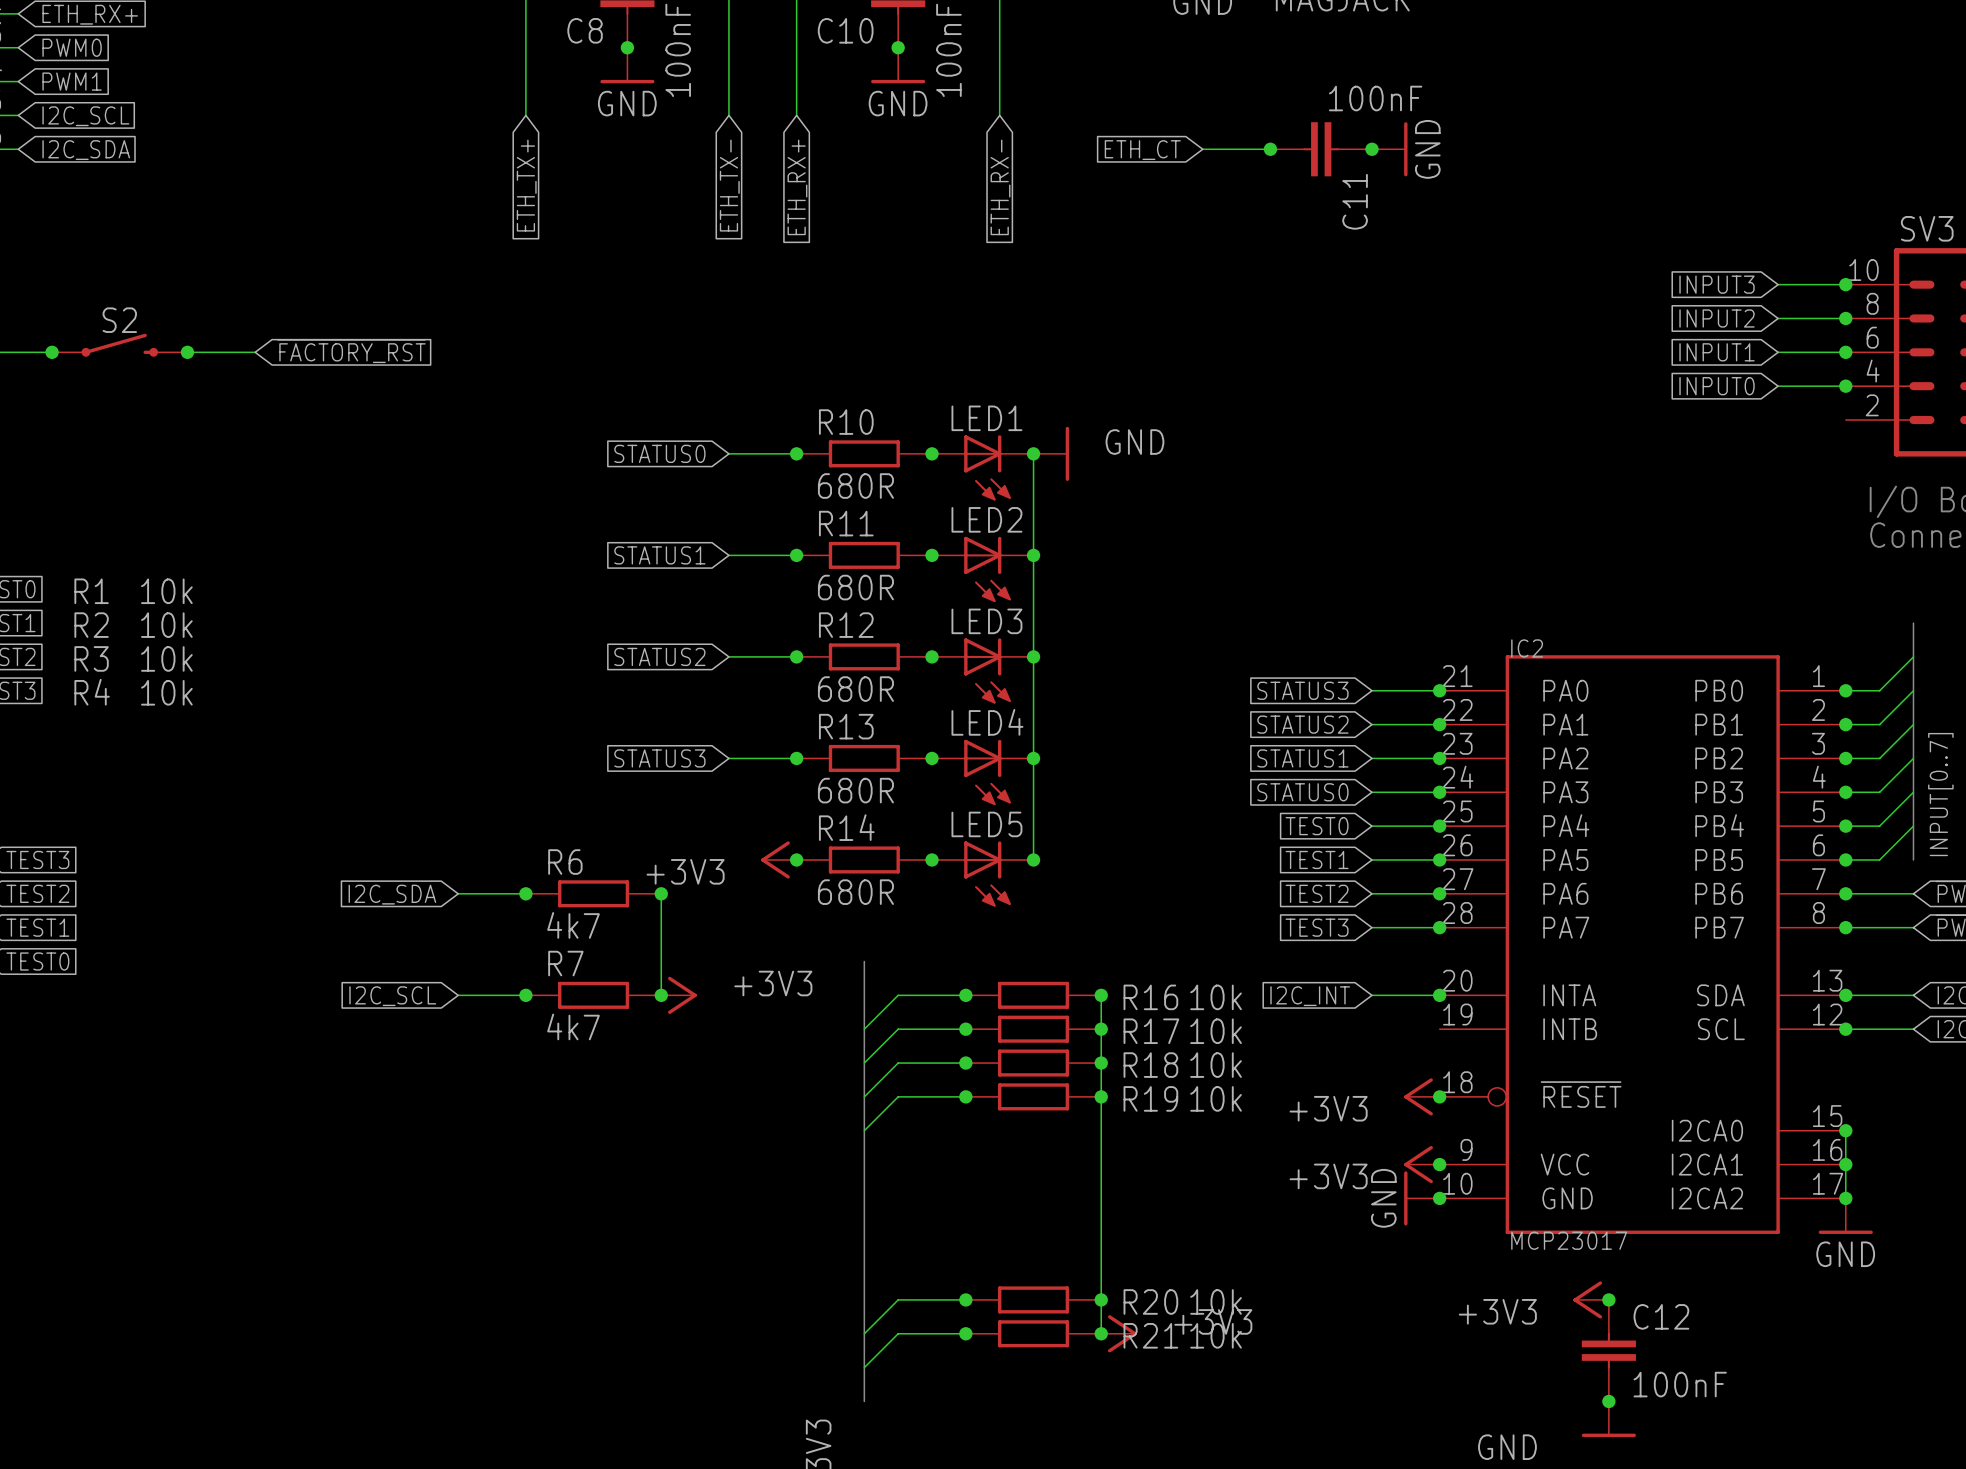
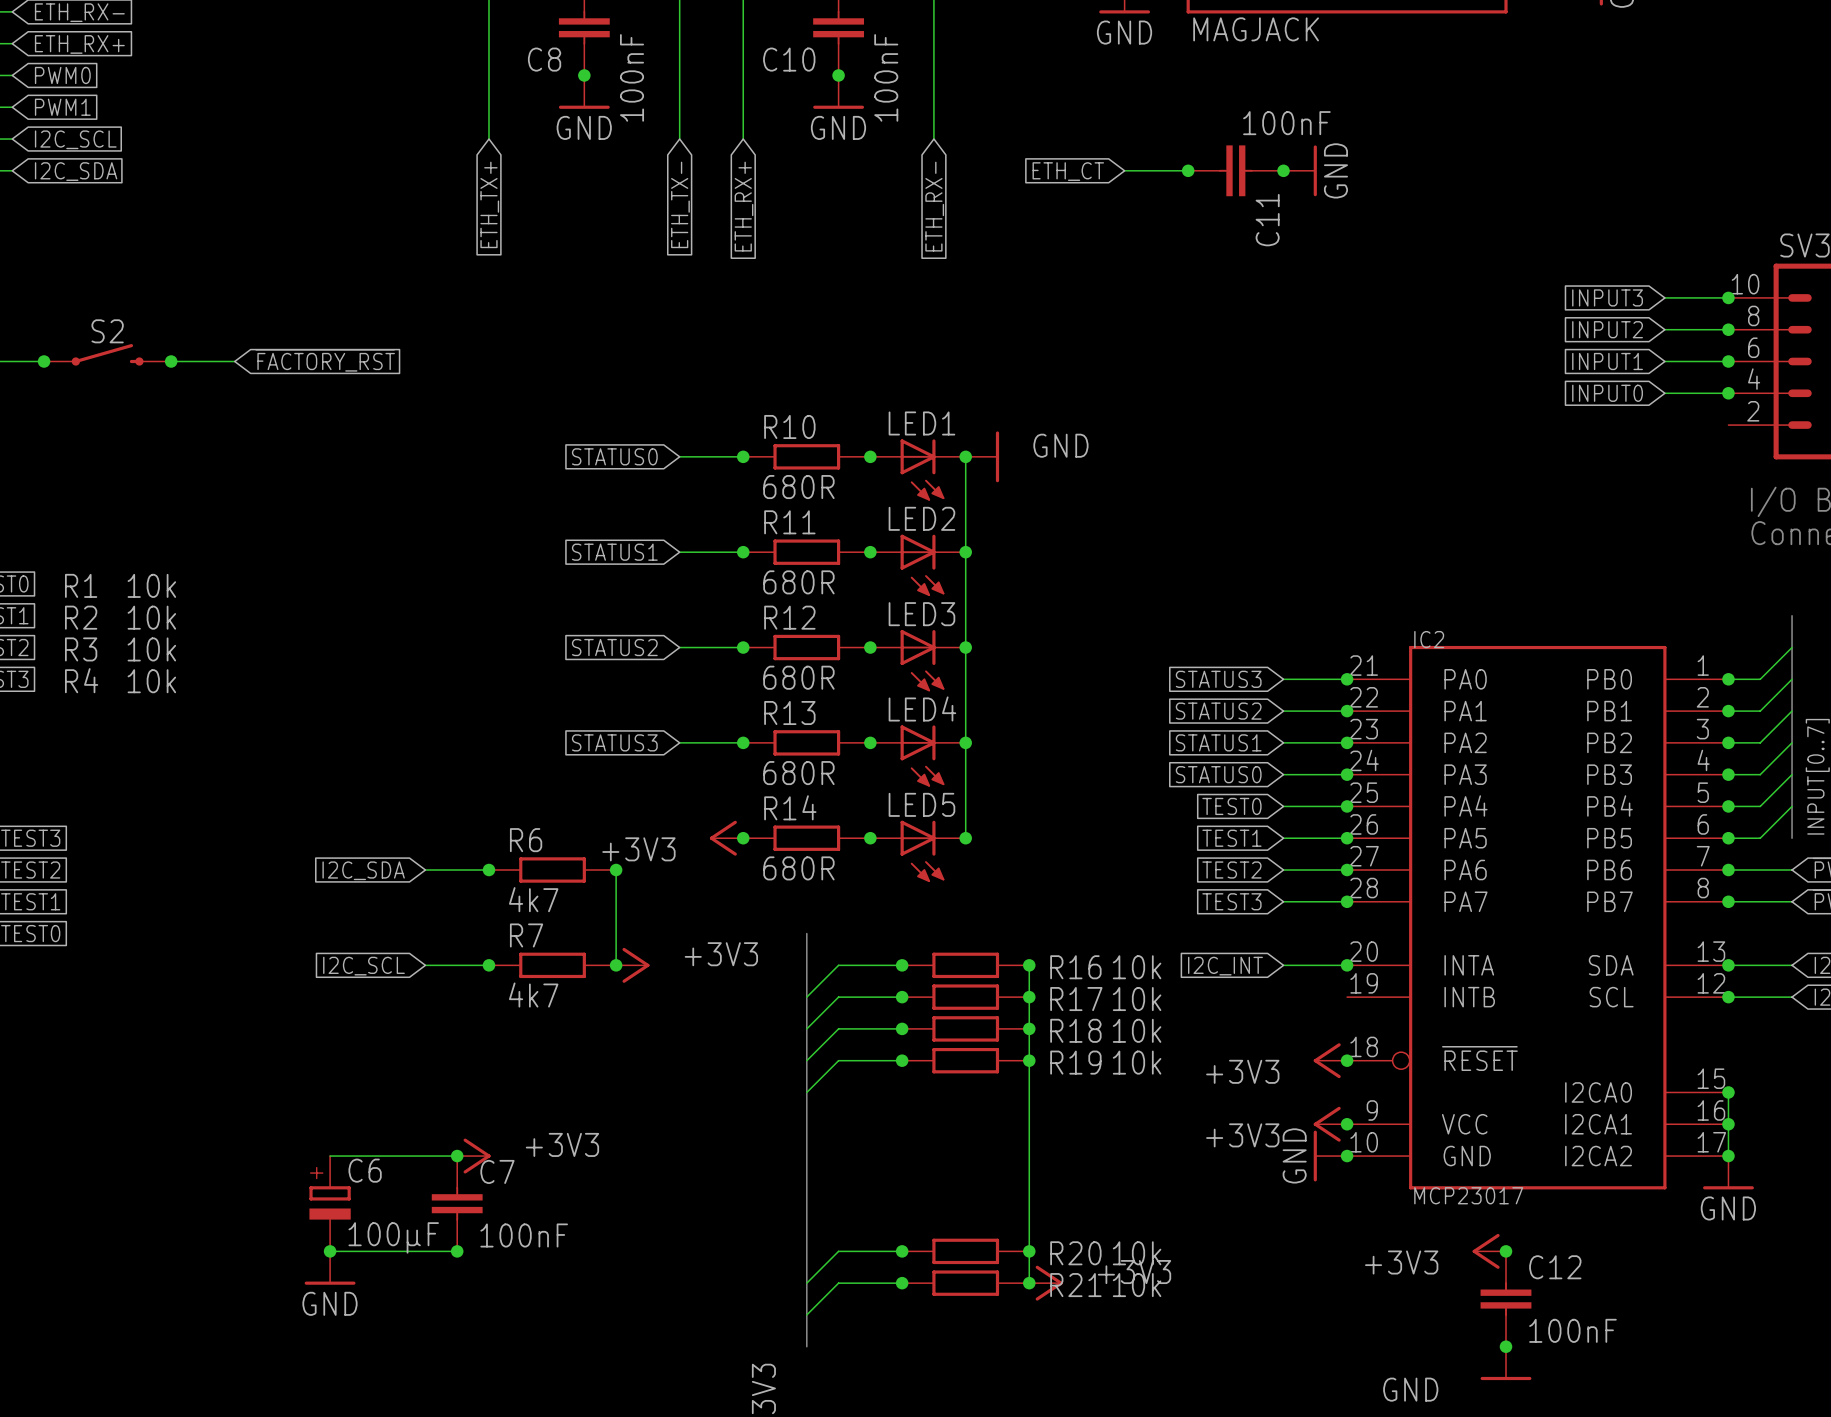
wire: none -> (330, 1156) (457, 1156)
junction: none -> (457, 1156)
power symbol: none -> +3V3 (473, 1156)
C6: none -> 100µF (330, 1203)
C7: none -> 100nF (457, 1203)
wire: none -> (330, 1251) (457, 1251)
junction: none -> (330, 1251)
junction: none -> (457, 1251)
power symbol: none -> GND (330, 1268)

